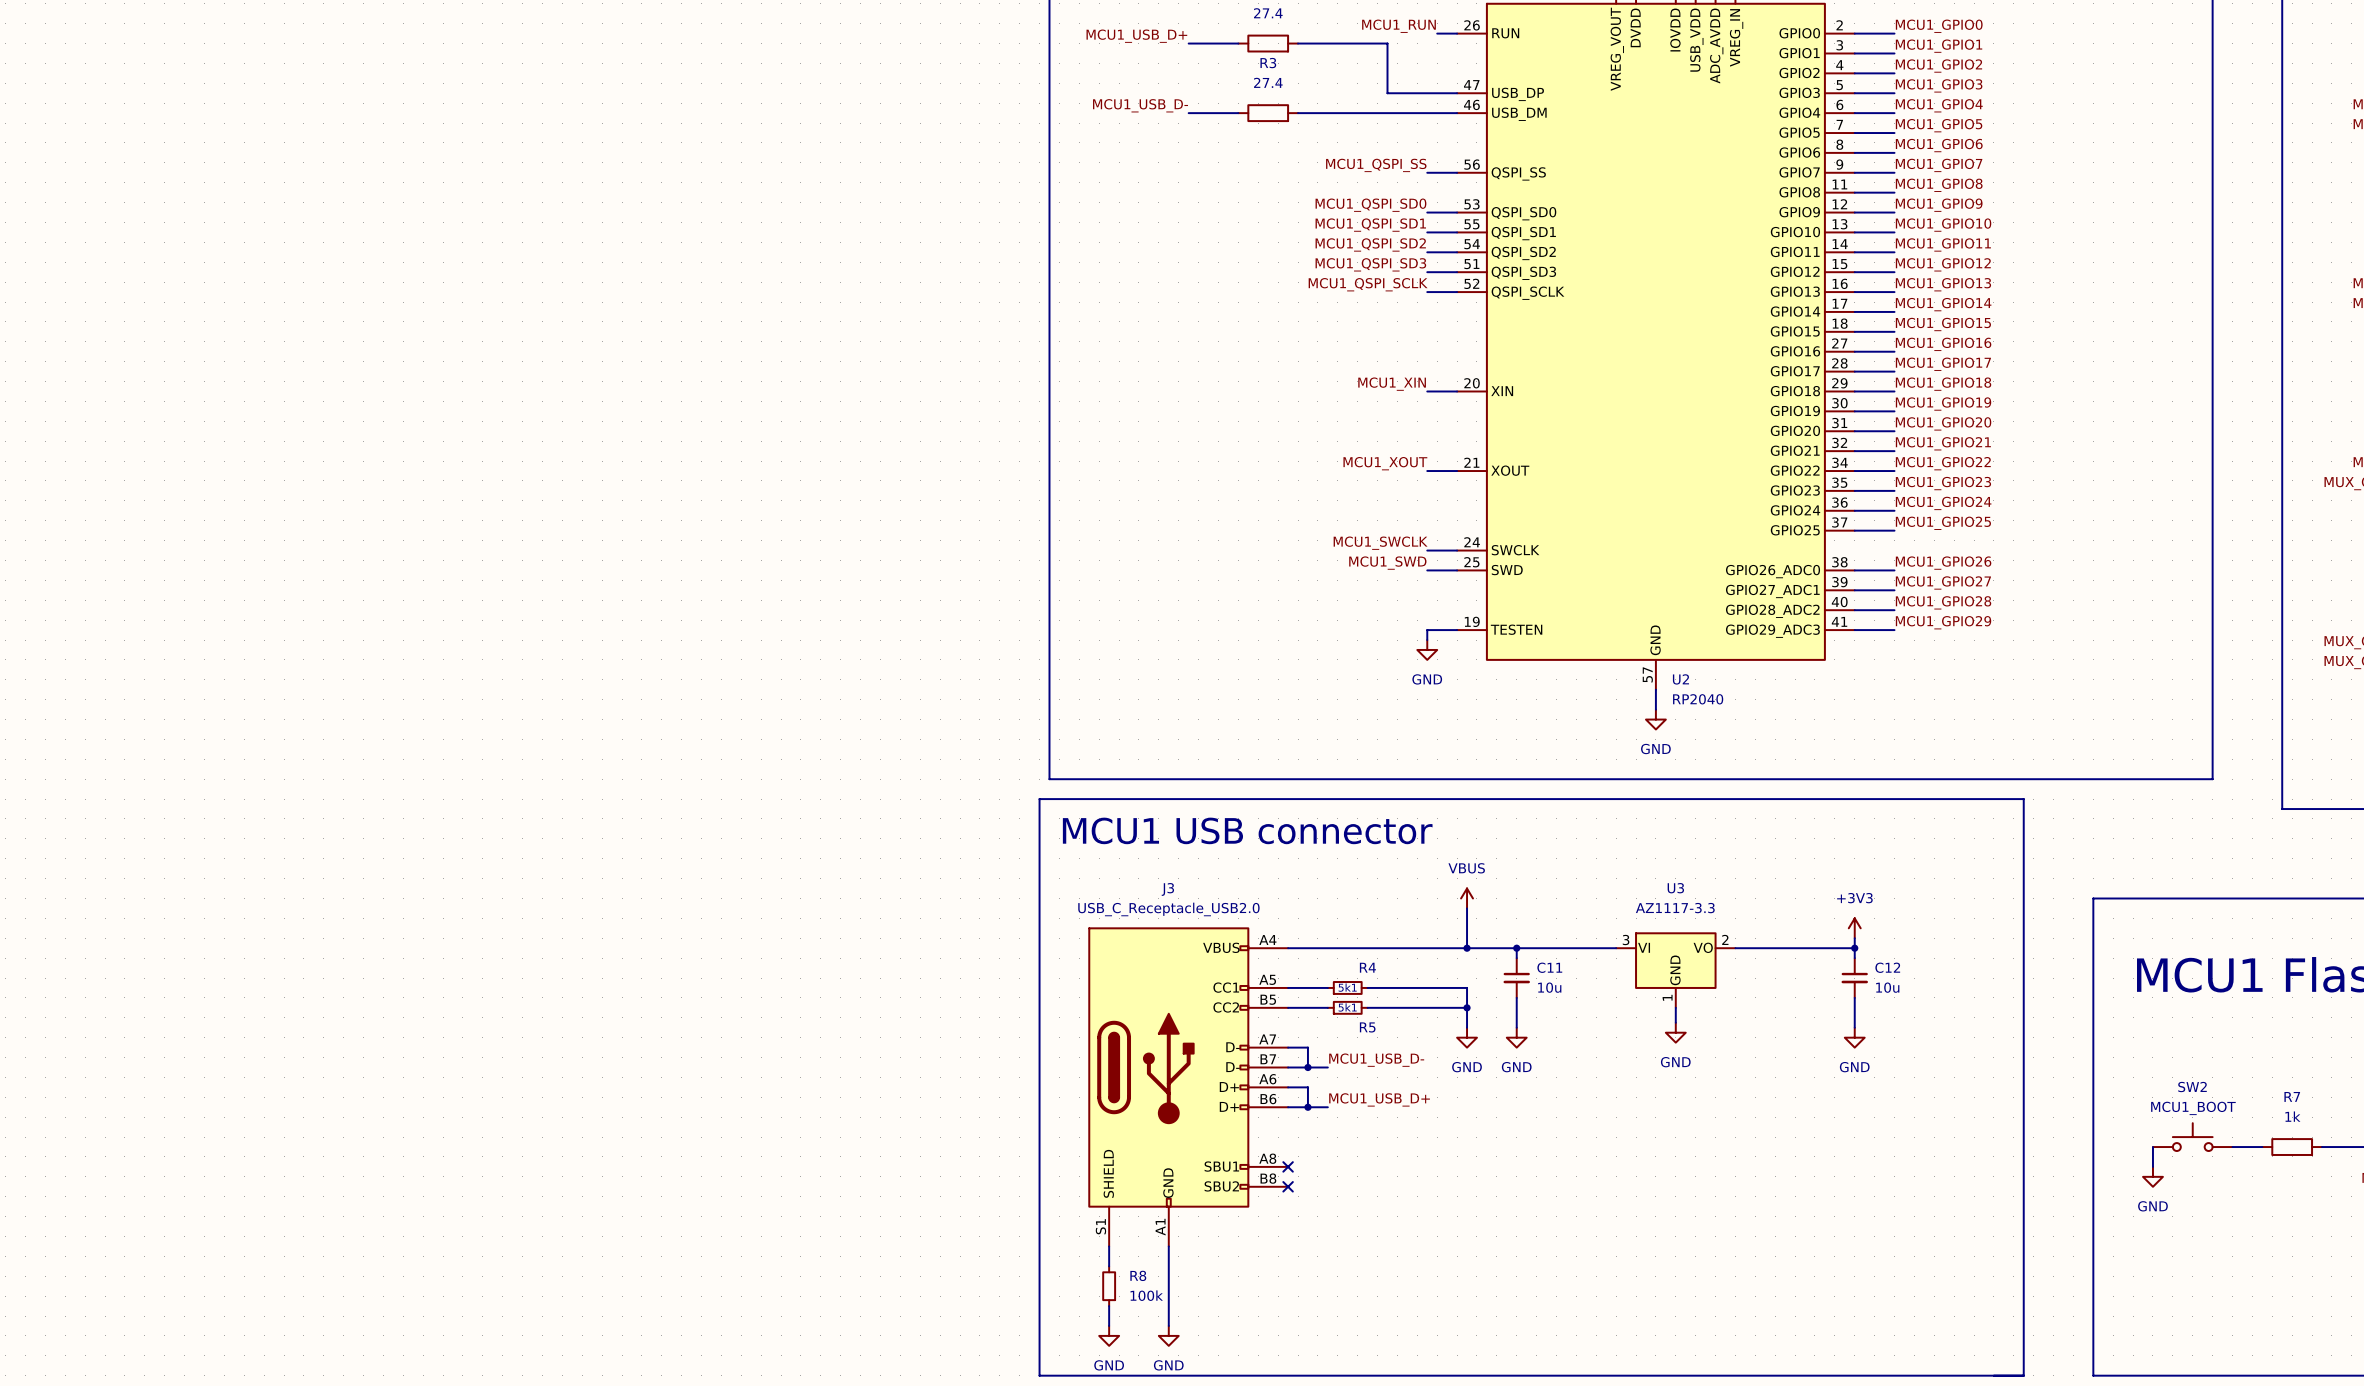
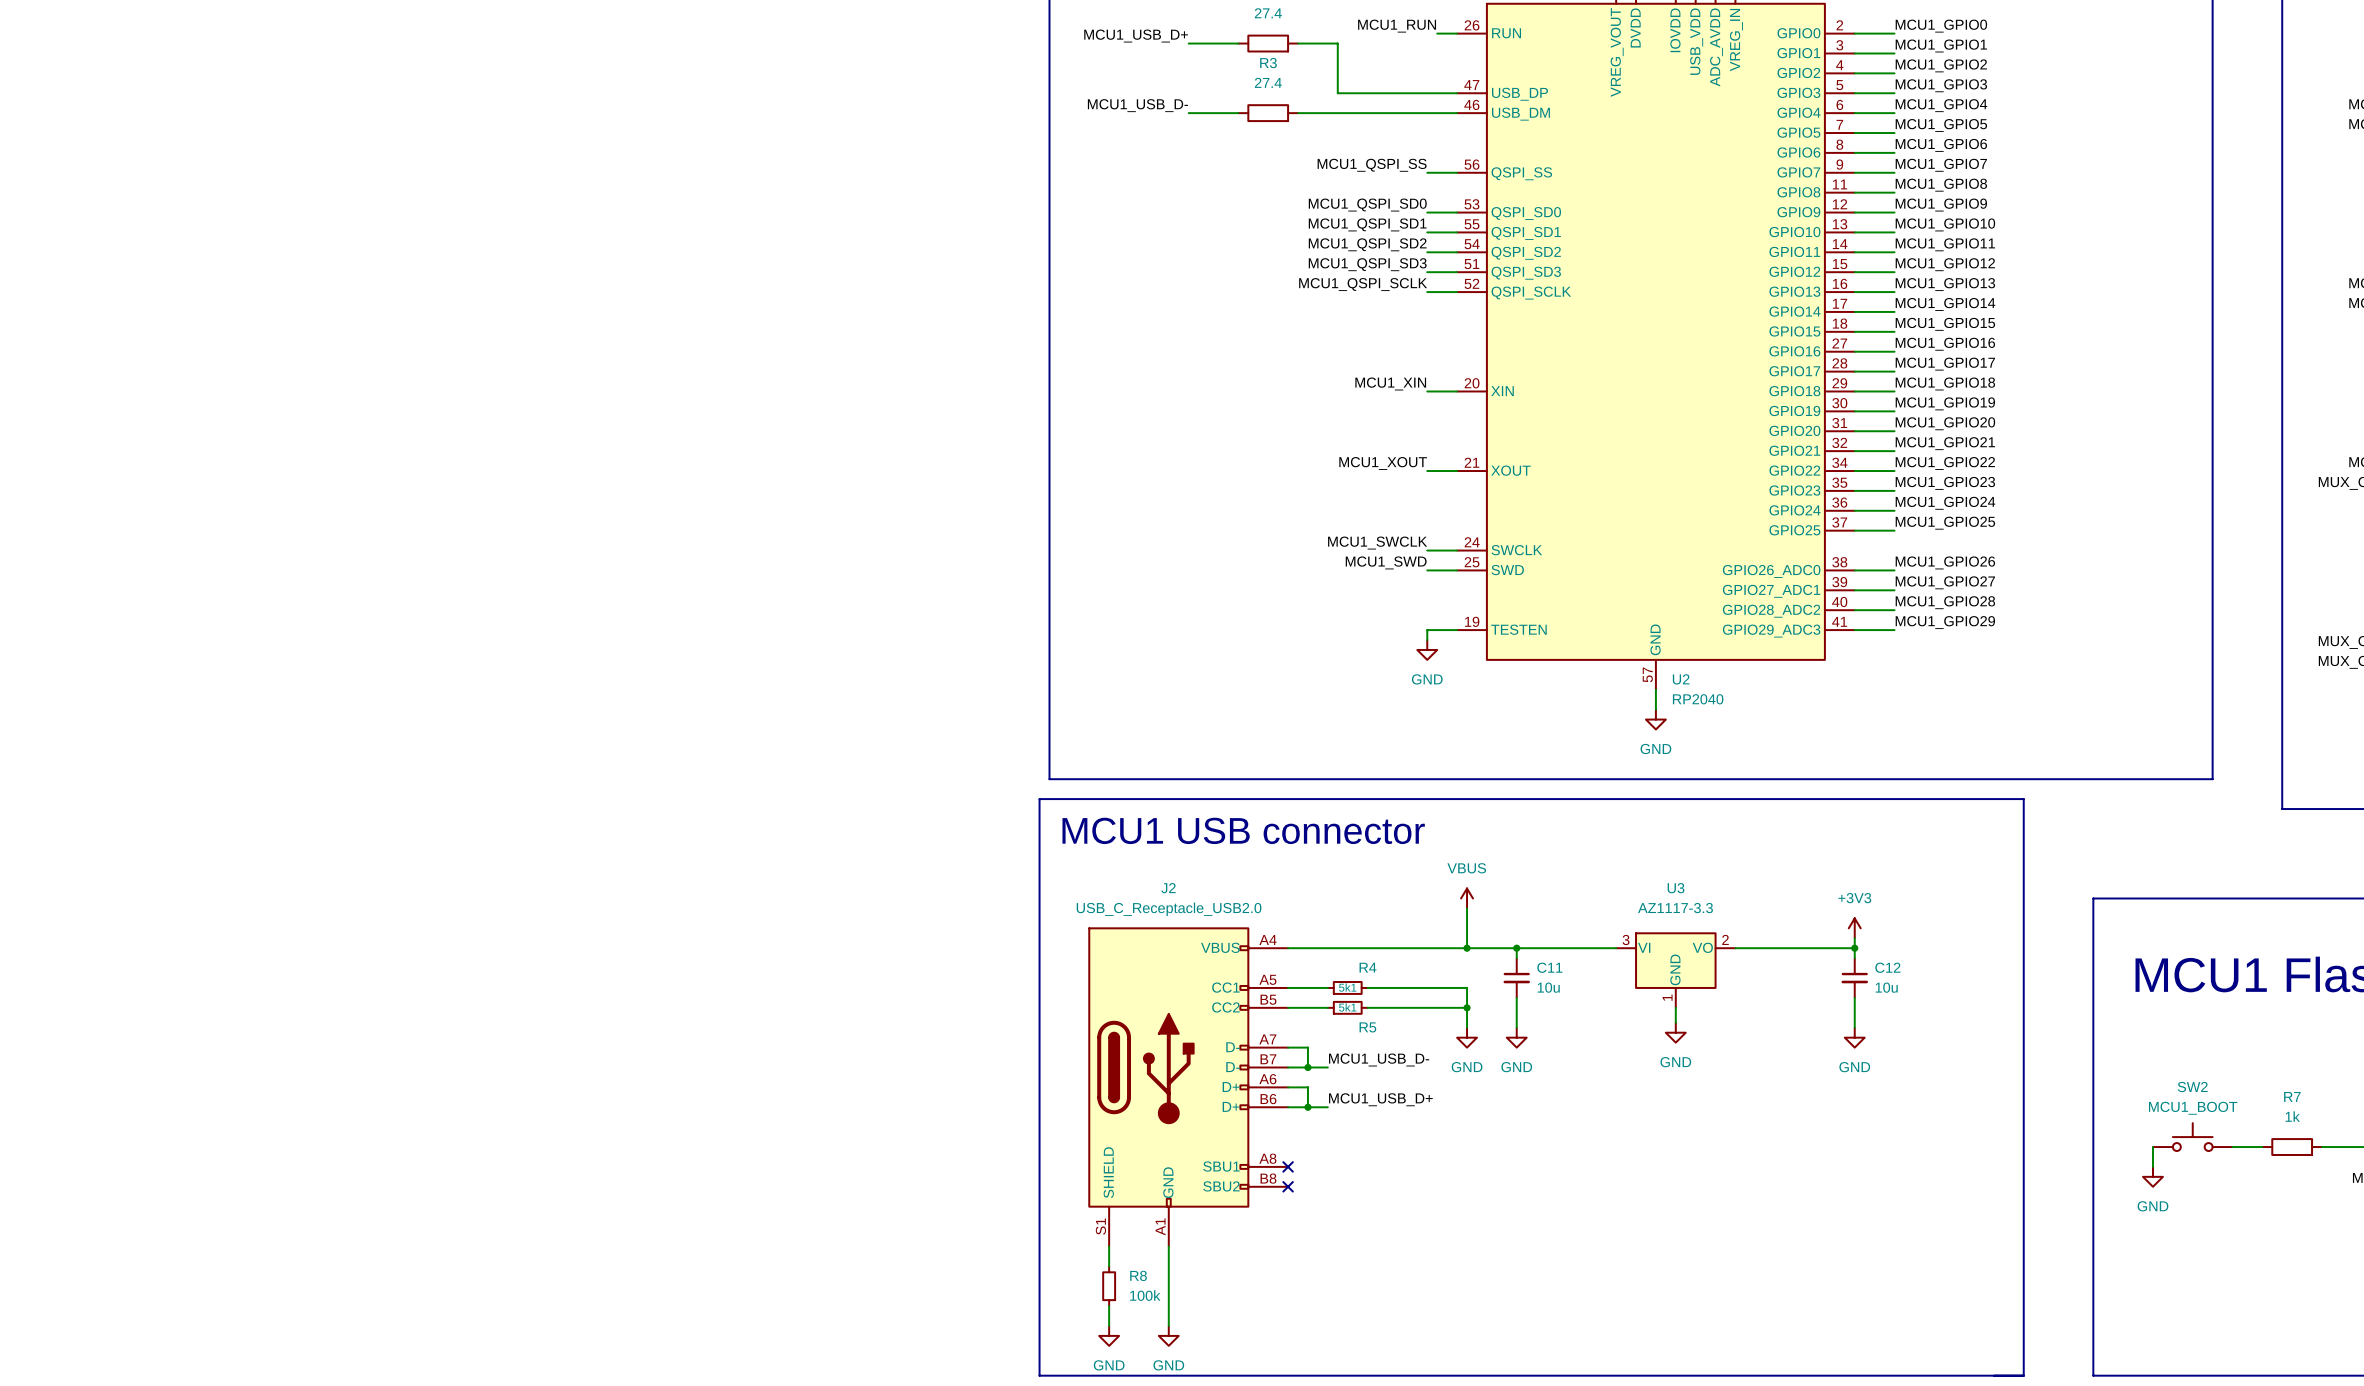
wire: (1337, 43) (1387, 43) (1387, 93) -> (1337, 43) (1337, 93) (1387, 93)
J3 name: J3 (1167, 889) -> J2 (1168, 888)

